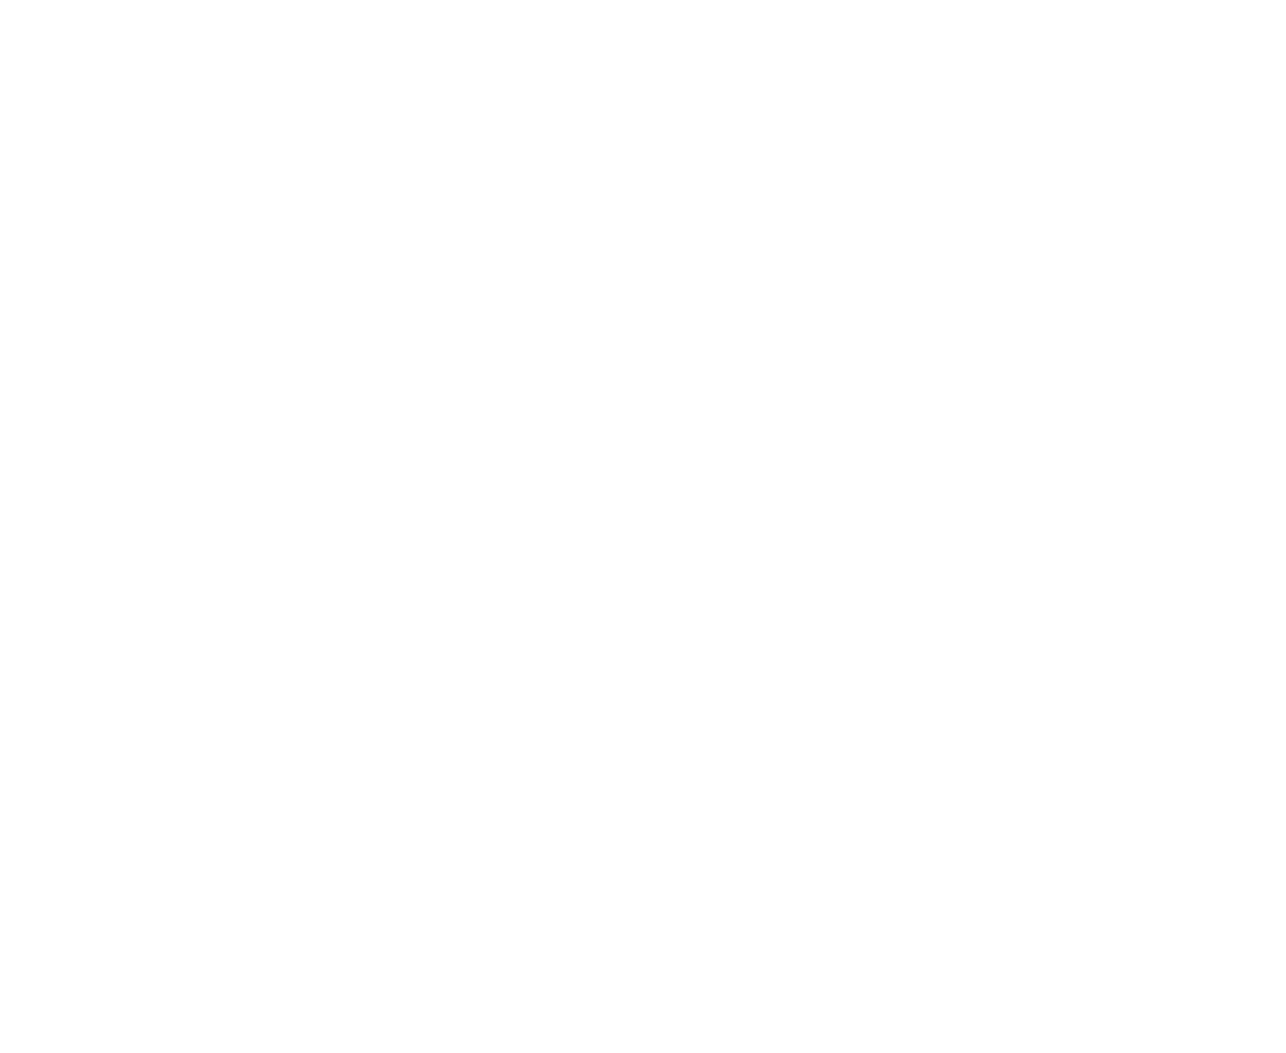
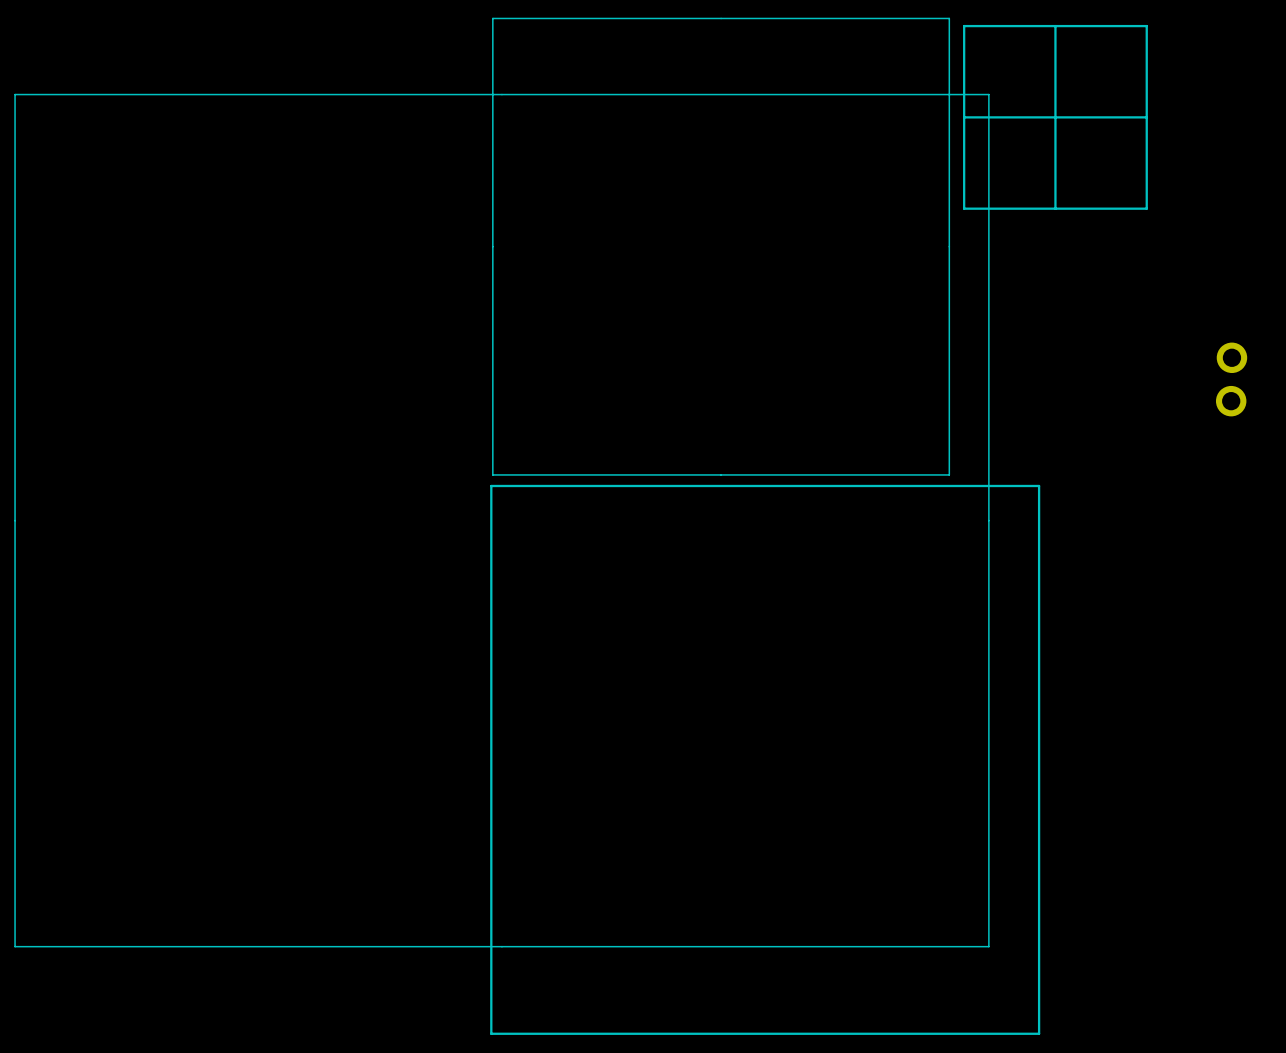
drawing: none -> [14, 17, 1148, 1035]
part: none -> (1231, 357)
part: none -> (1231, 401)

